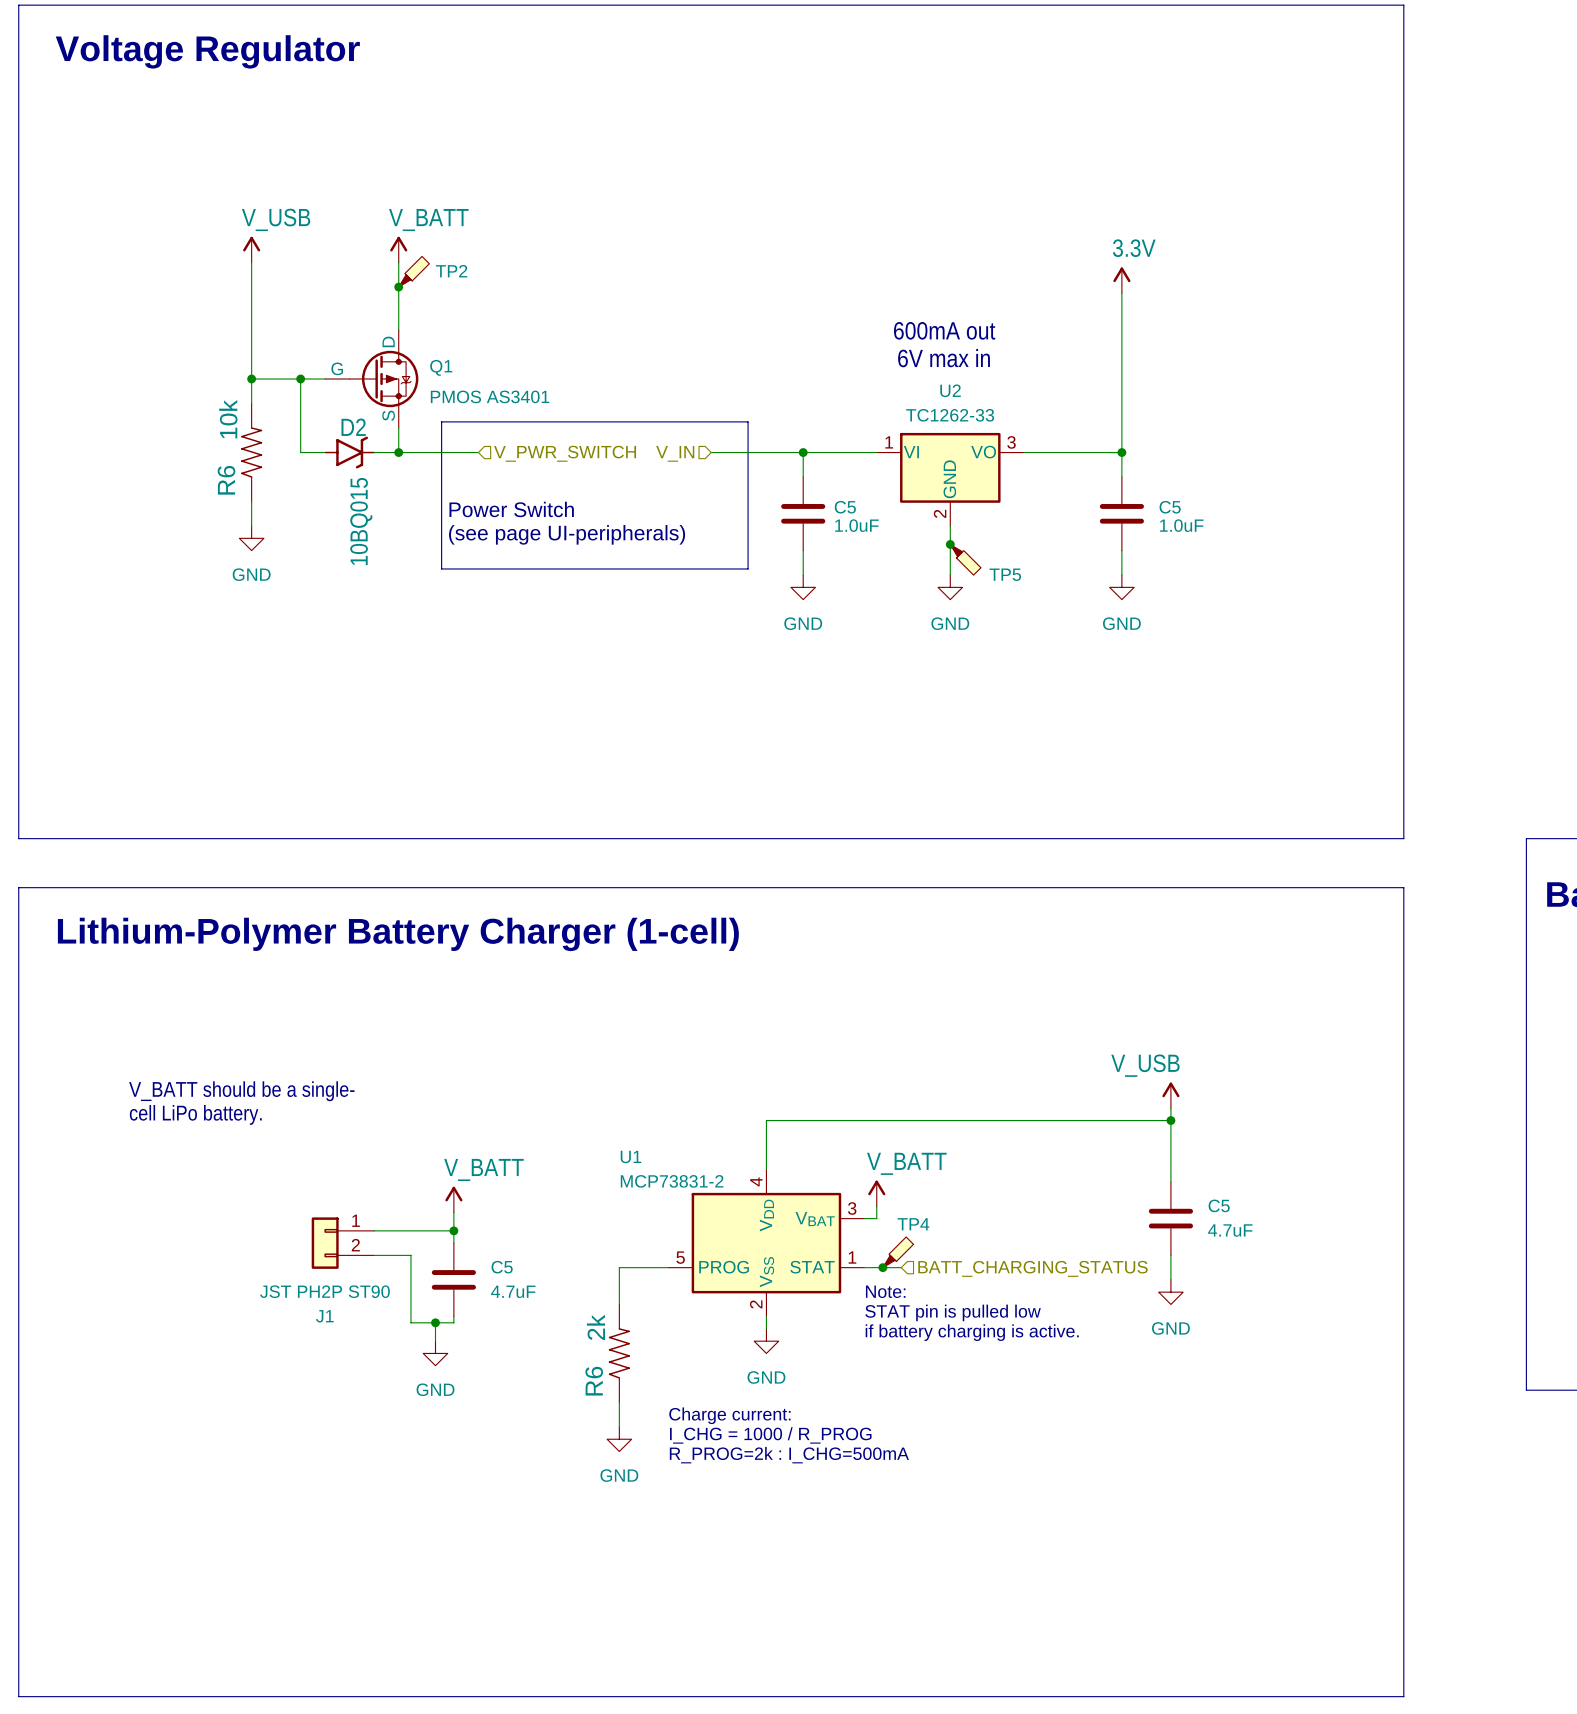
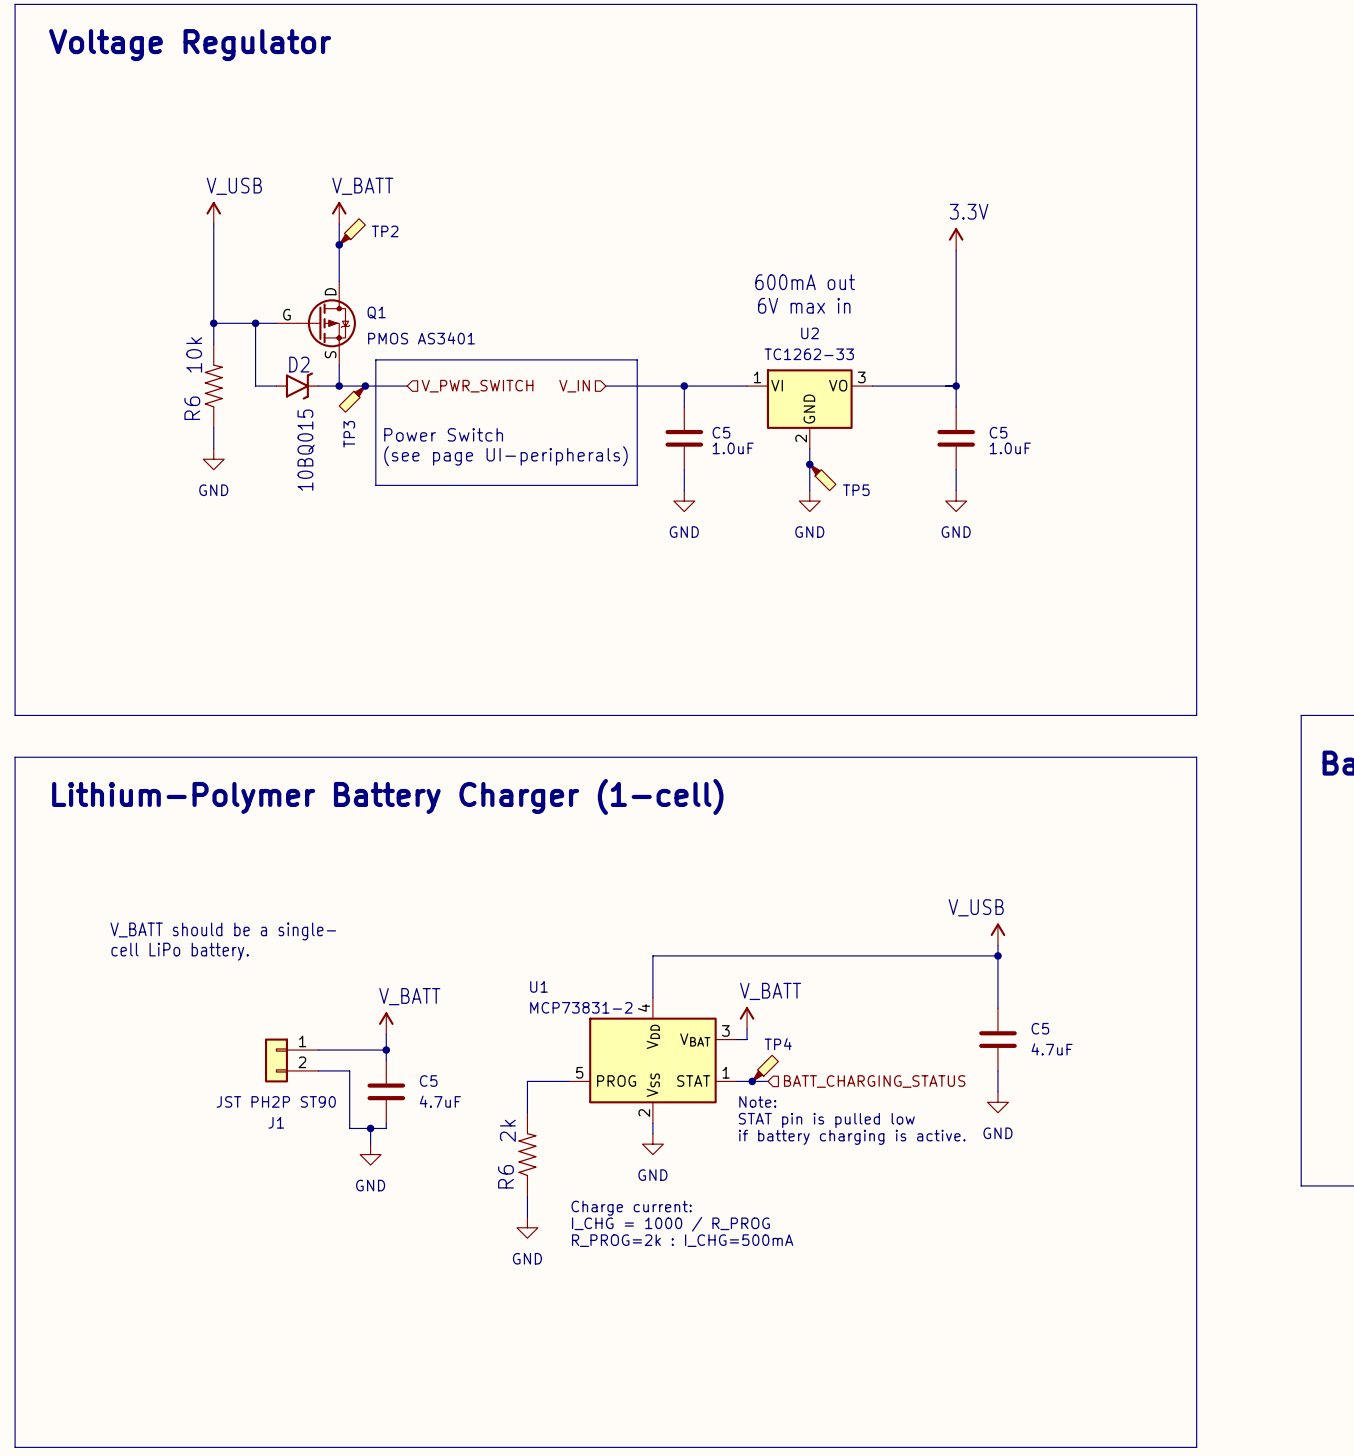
junction: none -> (365, 386)
TP3: none -> (352, 399)

